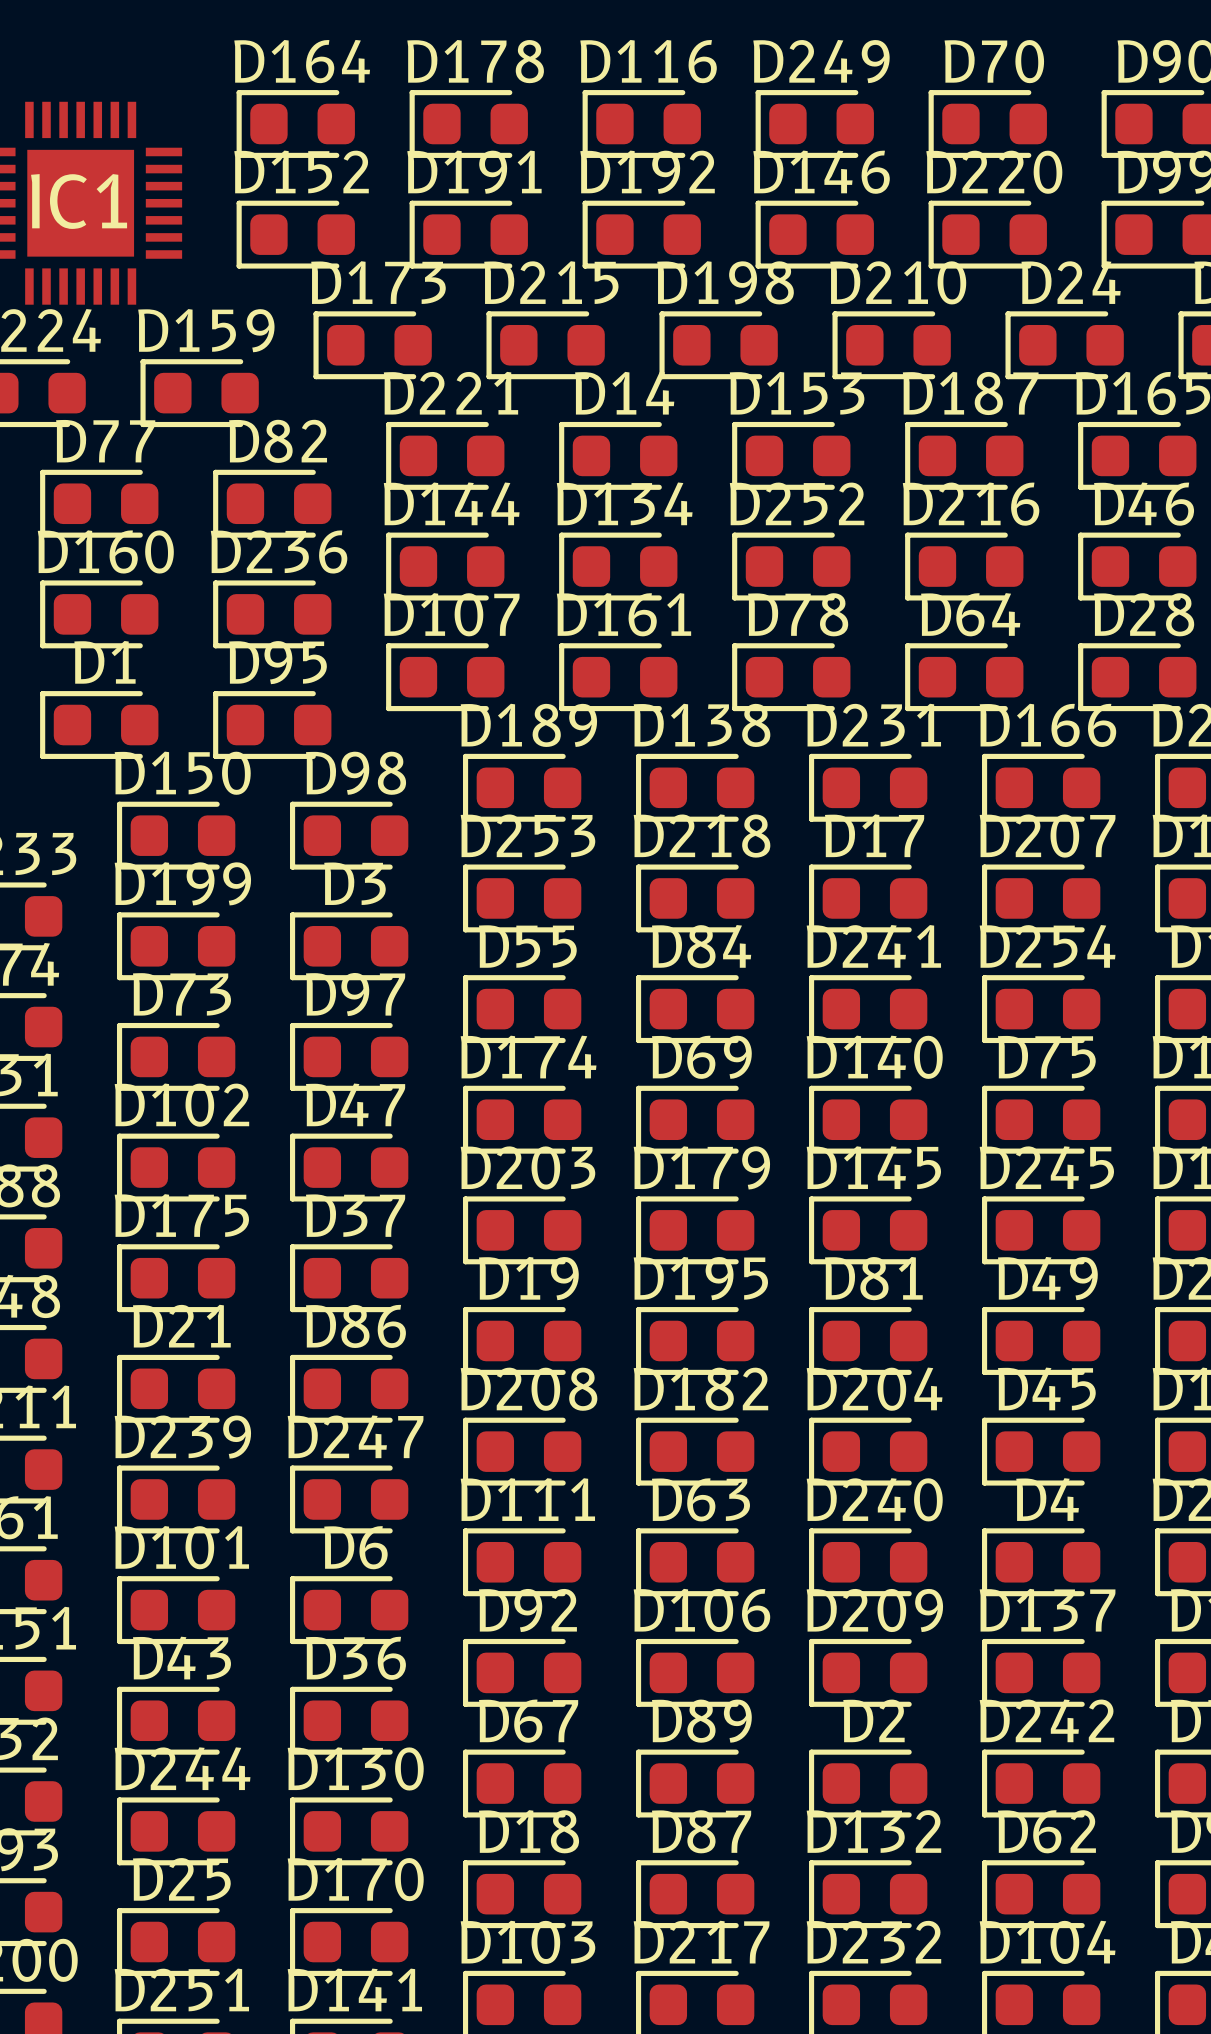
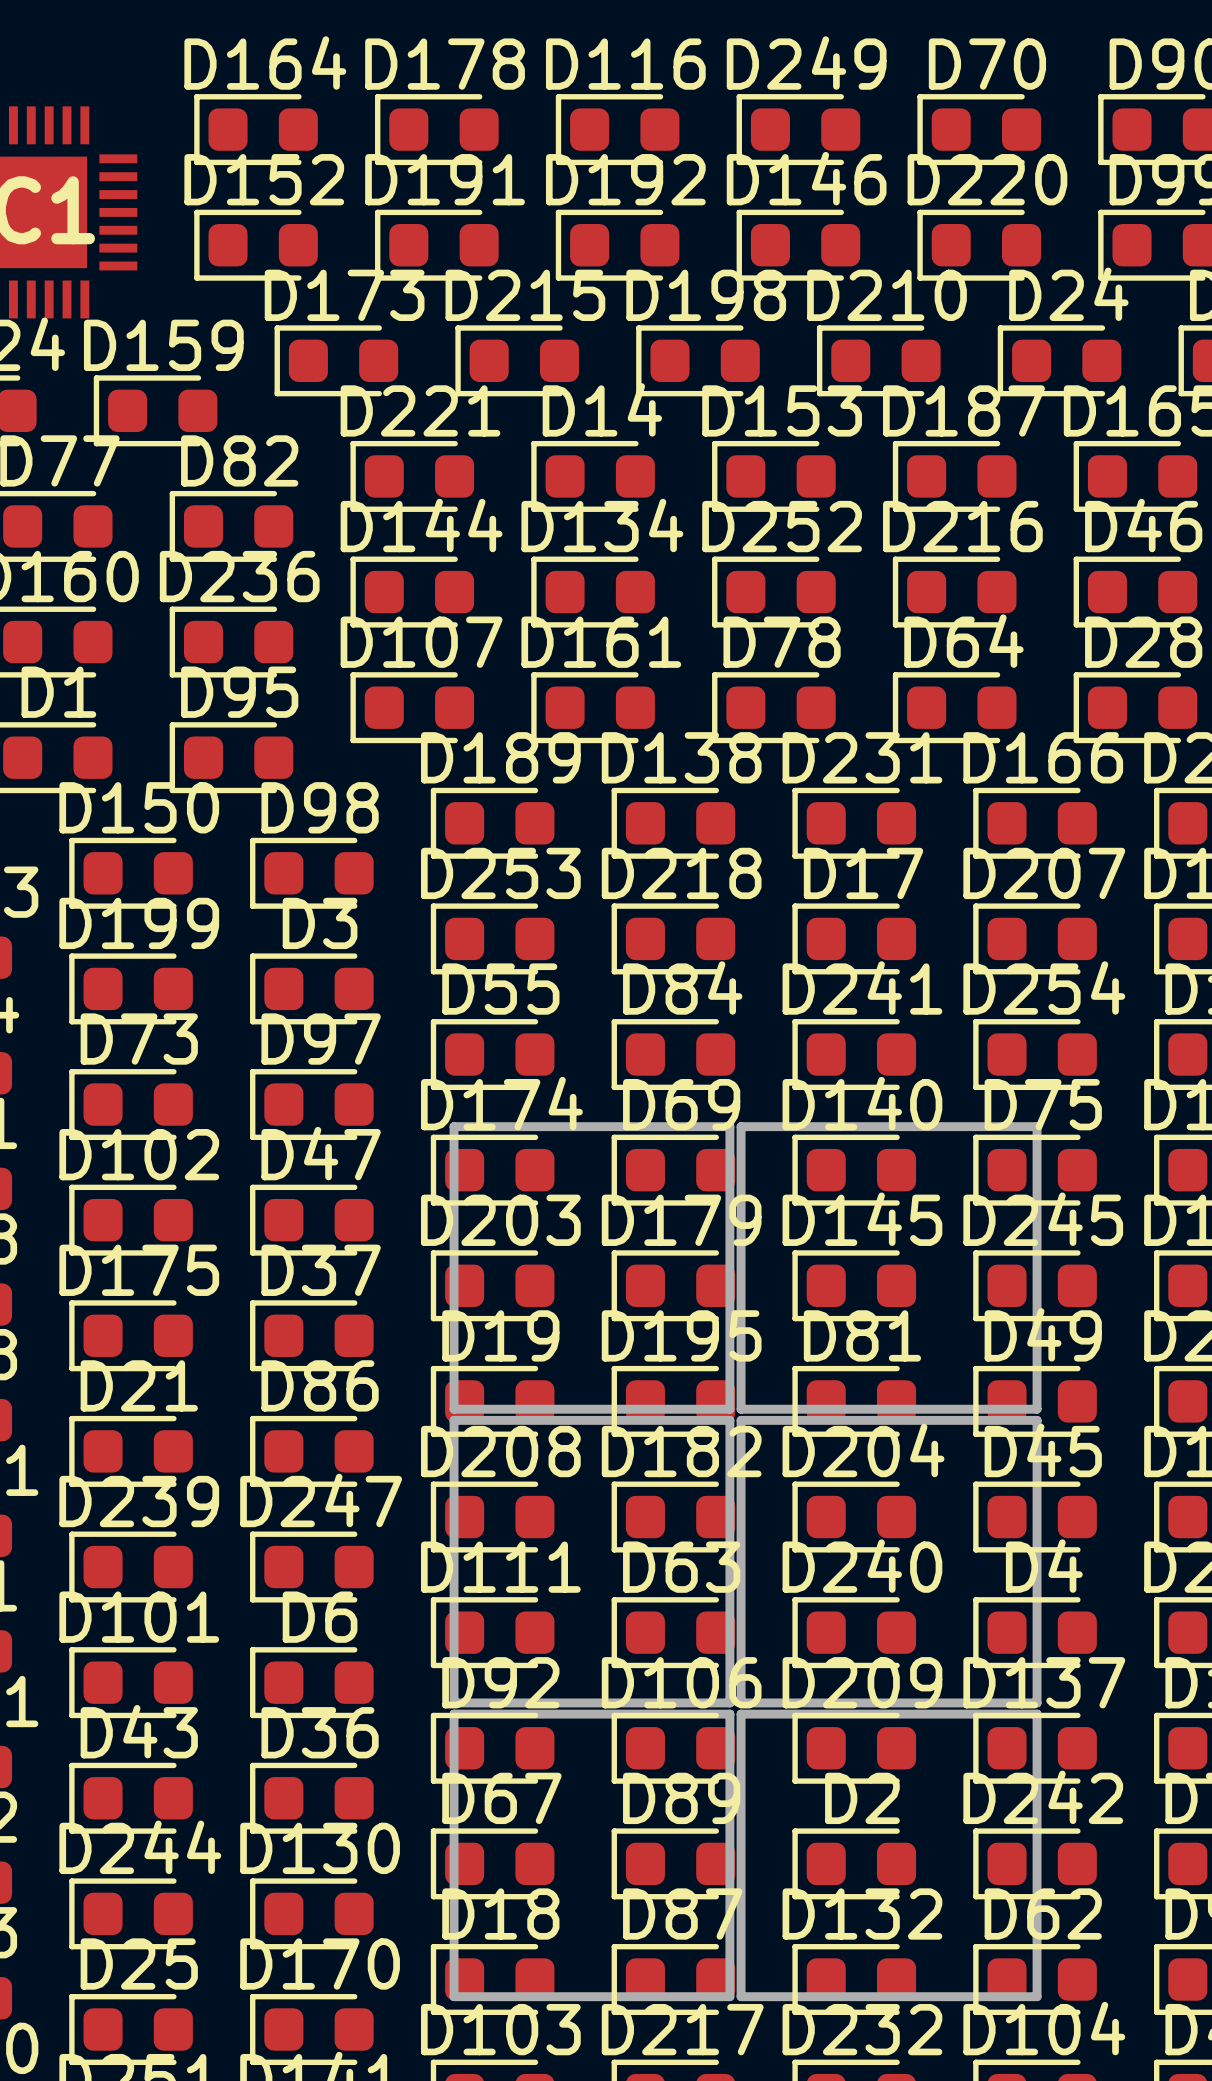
line: none -> (454, 1126) (729, 1126) (729, 1409) (454, 1409) (454, 1126)
line: none -> (741, 1126) (1037, 1126) (1037, 1409) (741, 1409) (741, 1126)
line: none -> (454, 1420) (729, 1420) (729, 1702) (454, 1702) (454, 1420)
line: none -> (741, 1420) (1037, 1420) (1037, 1702) (741, 1702) (741, 1420)
line: none -> (454, 1714) (729, 1714) (729, 1996) (454, 1996) (454, 1714)
line: none -> (741, 1714) (1037, 1714) (1037, 1996) (741, 1996) (741, 1714)

